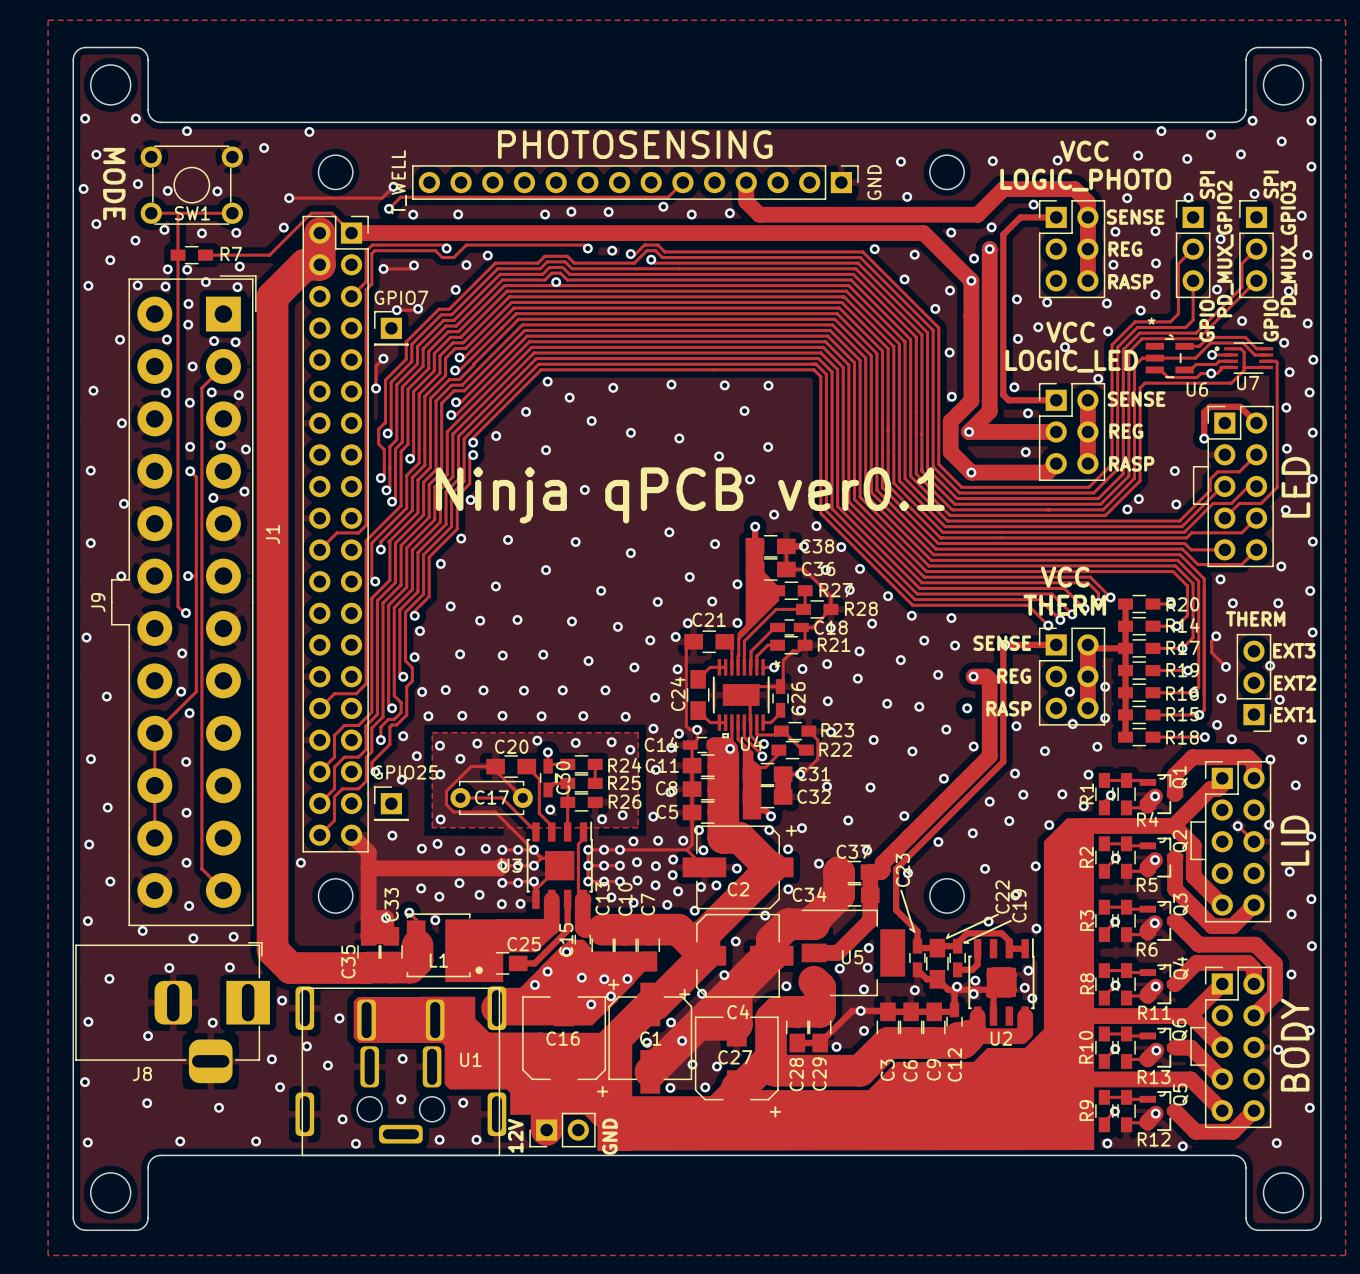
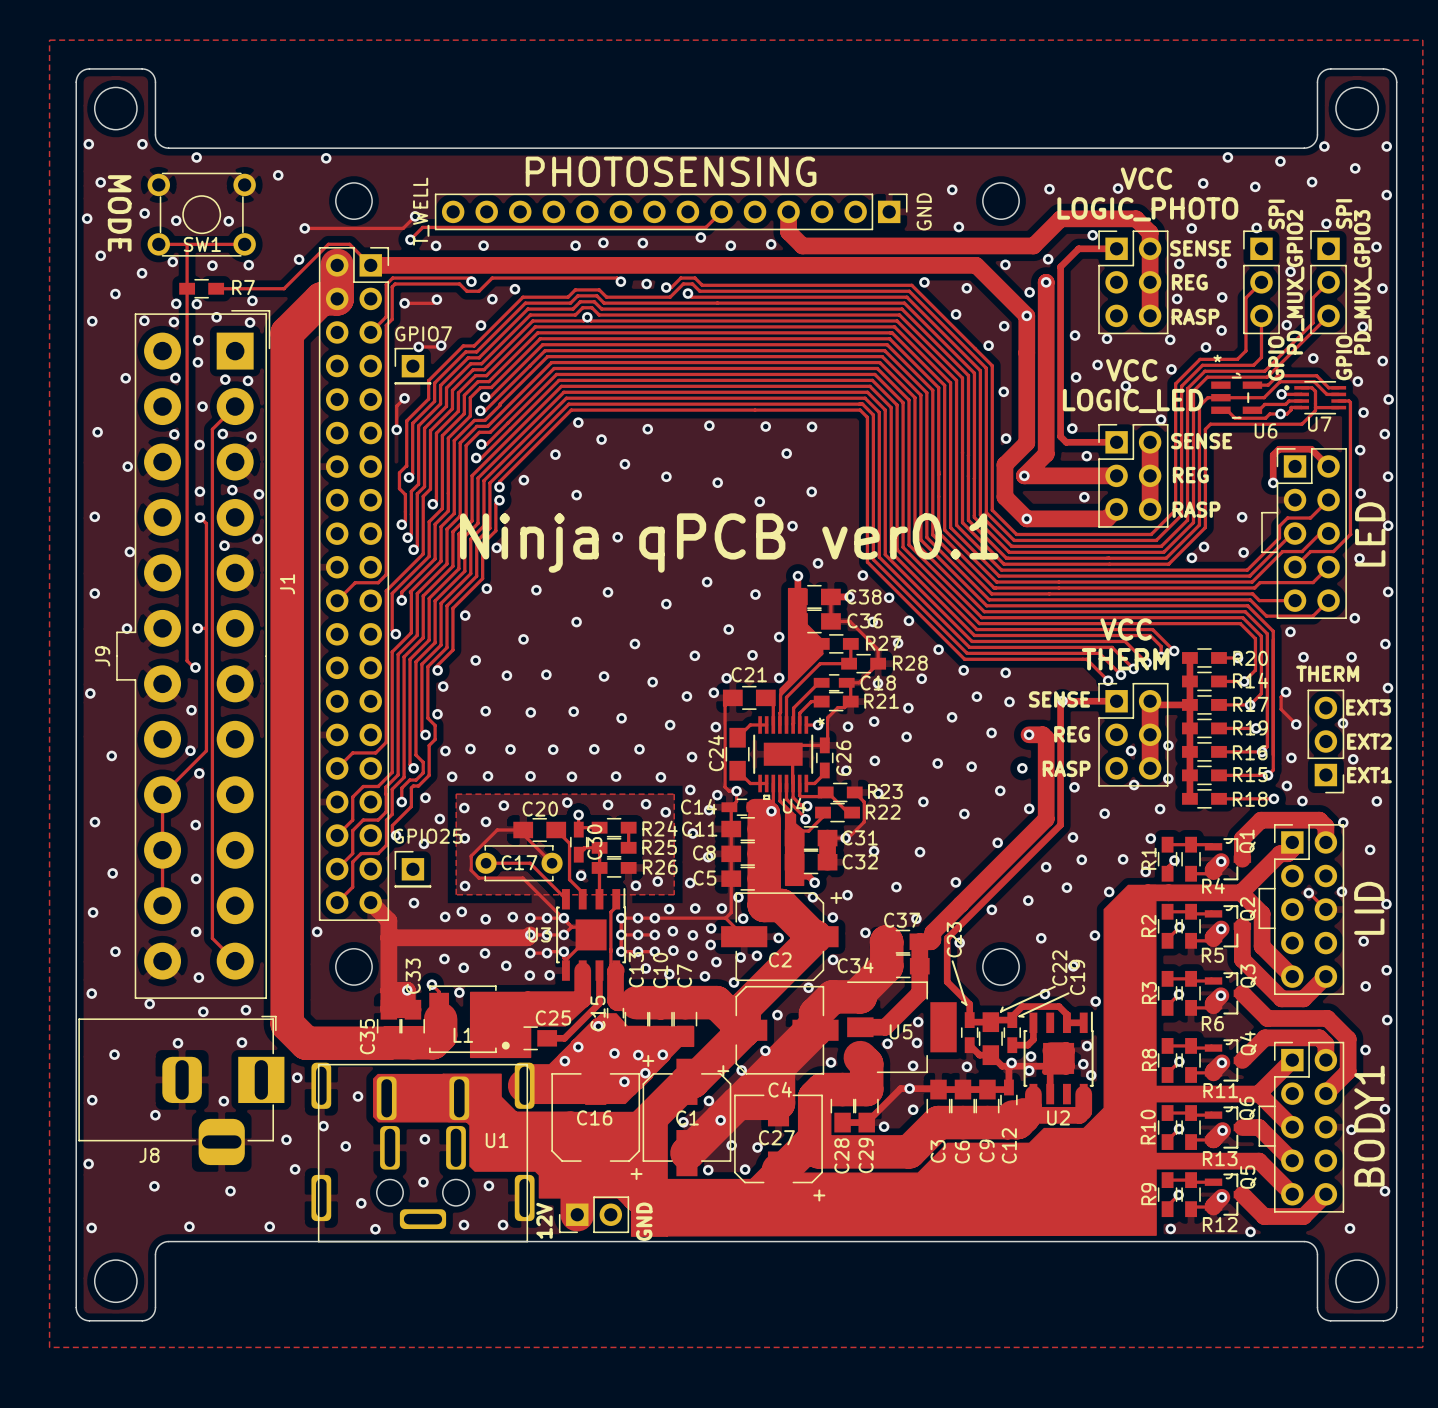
BODY name: BODY (1295, 1045) -> BODY1 (1369, 1126)

